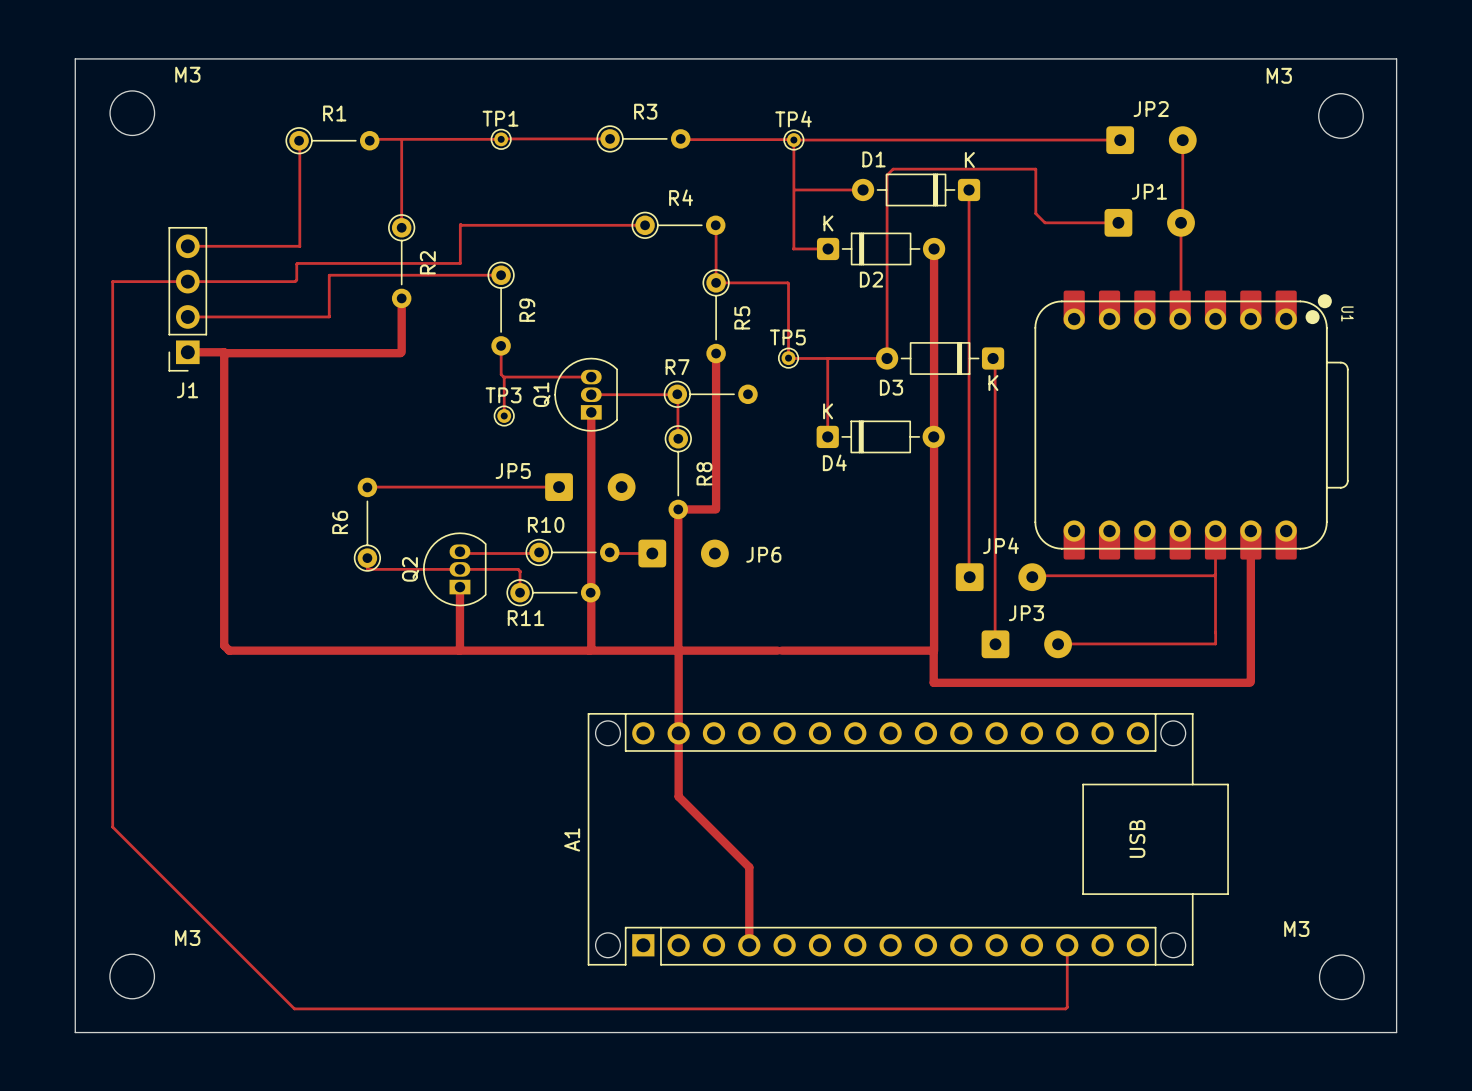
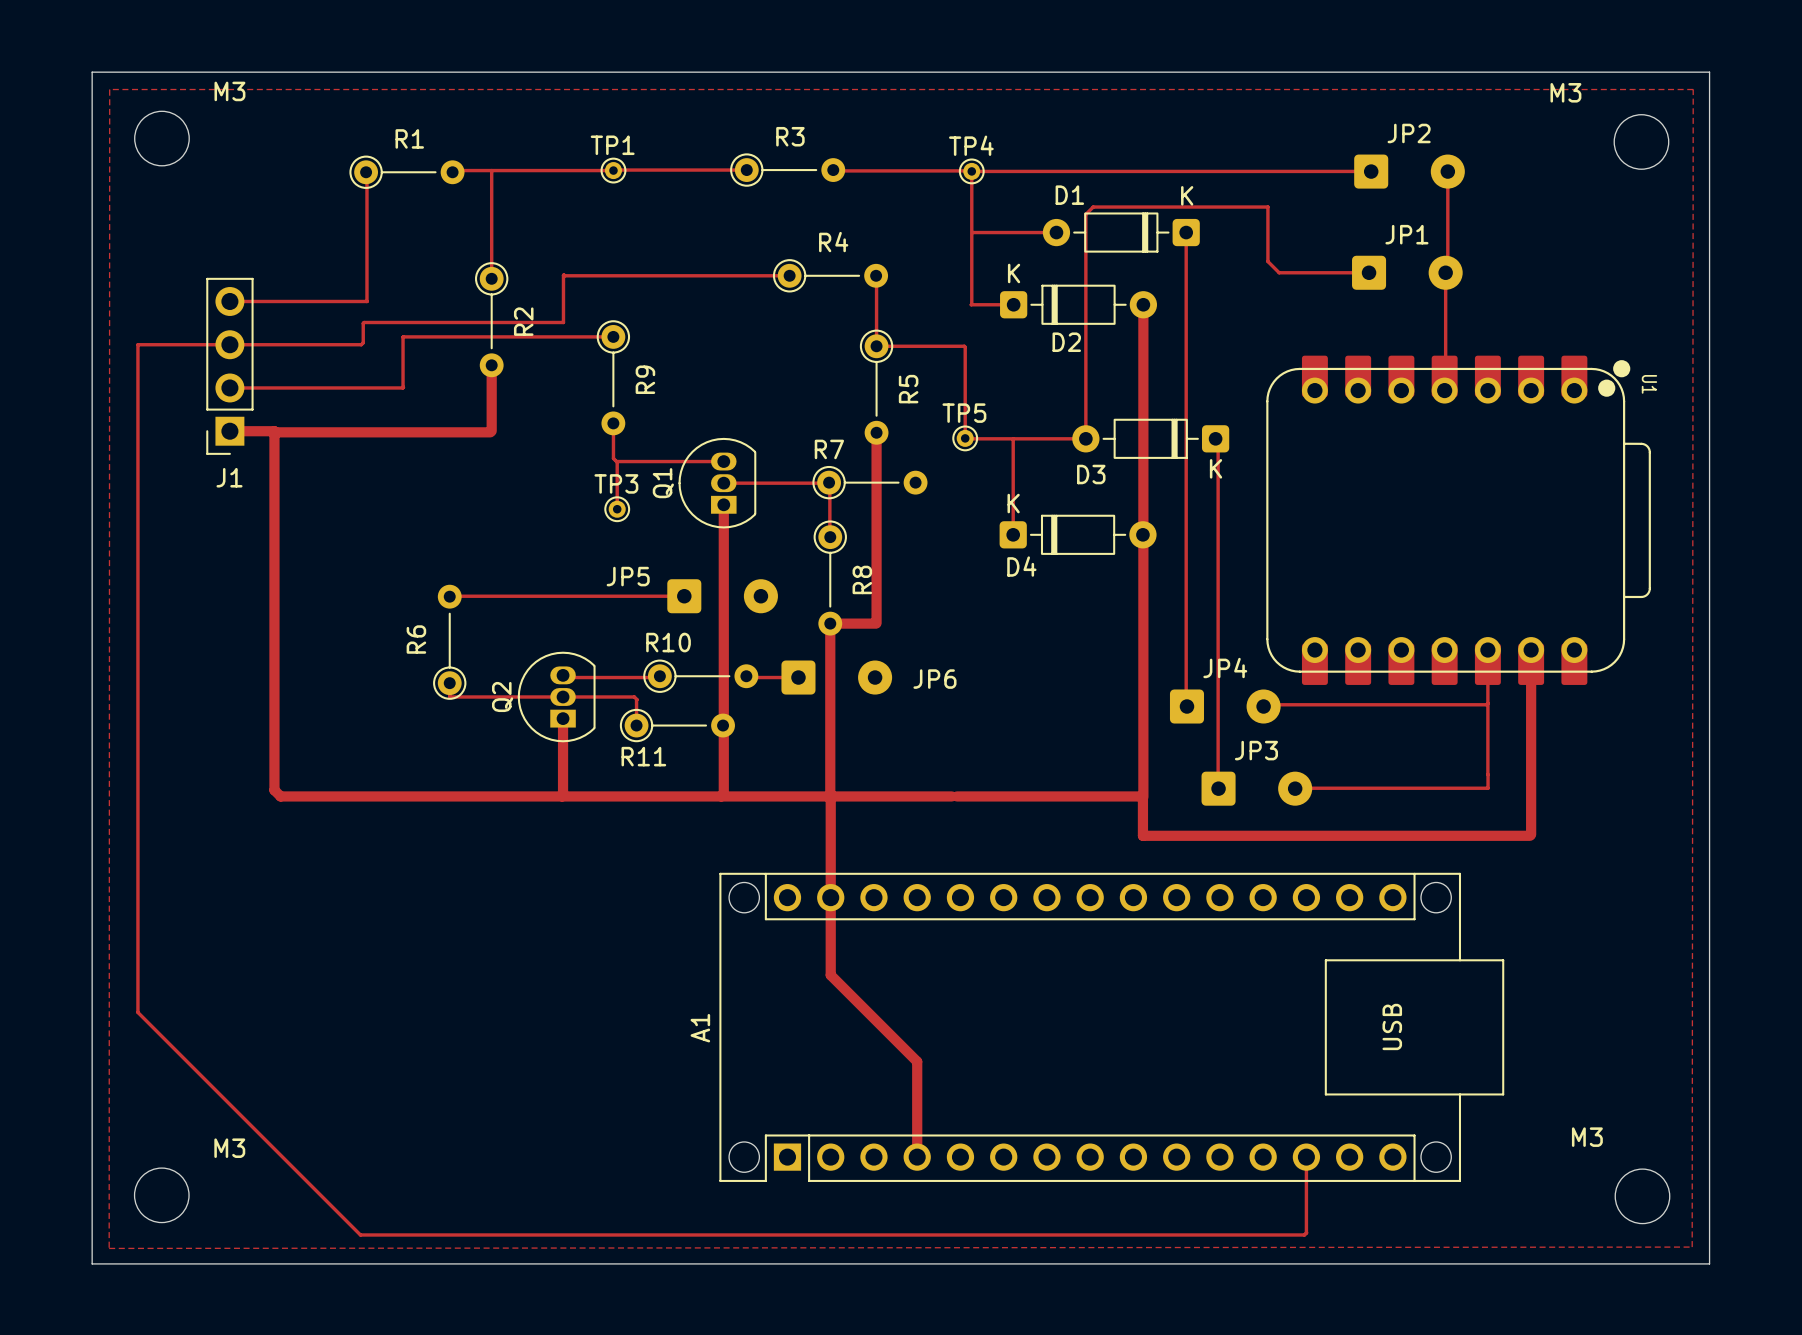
zone outline: none -> (109, 89) (1693, 89) (1692, 1247) (109, 1248) (109, 89)

